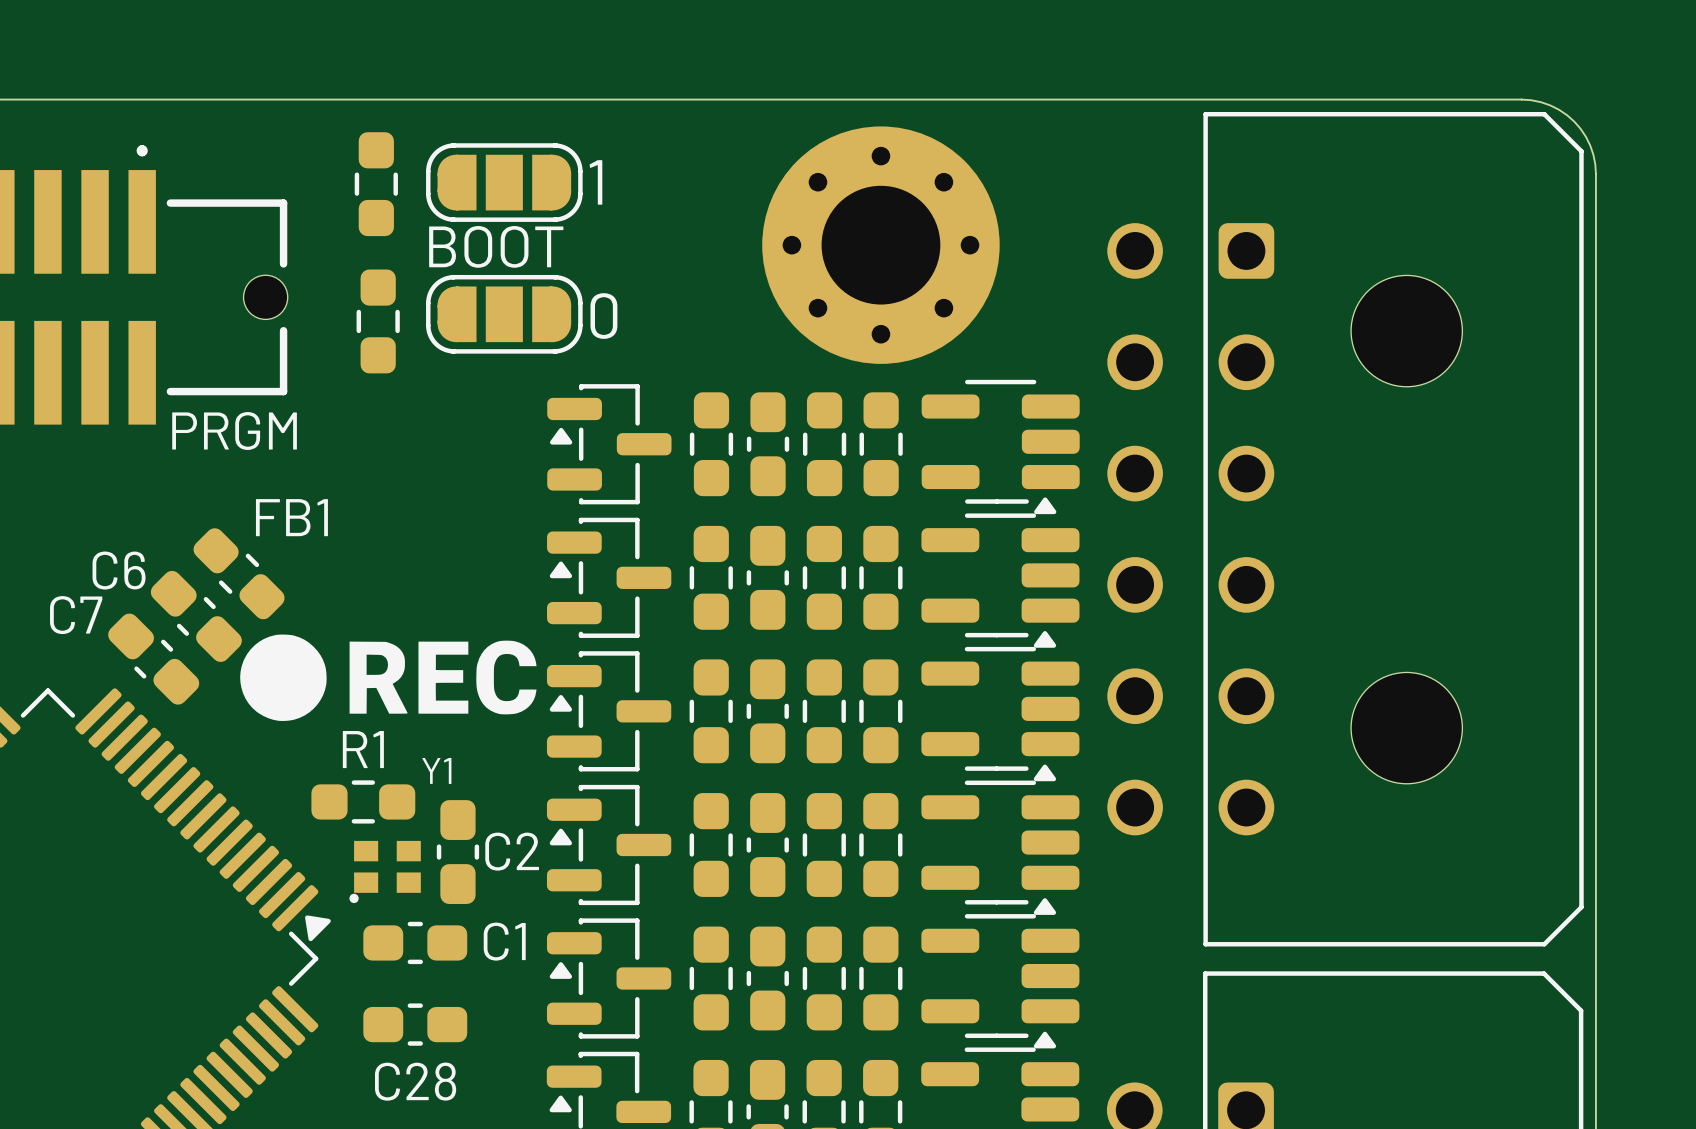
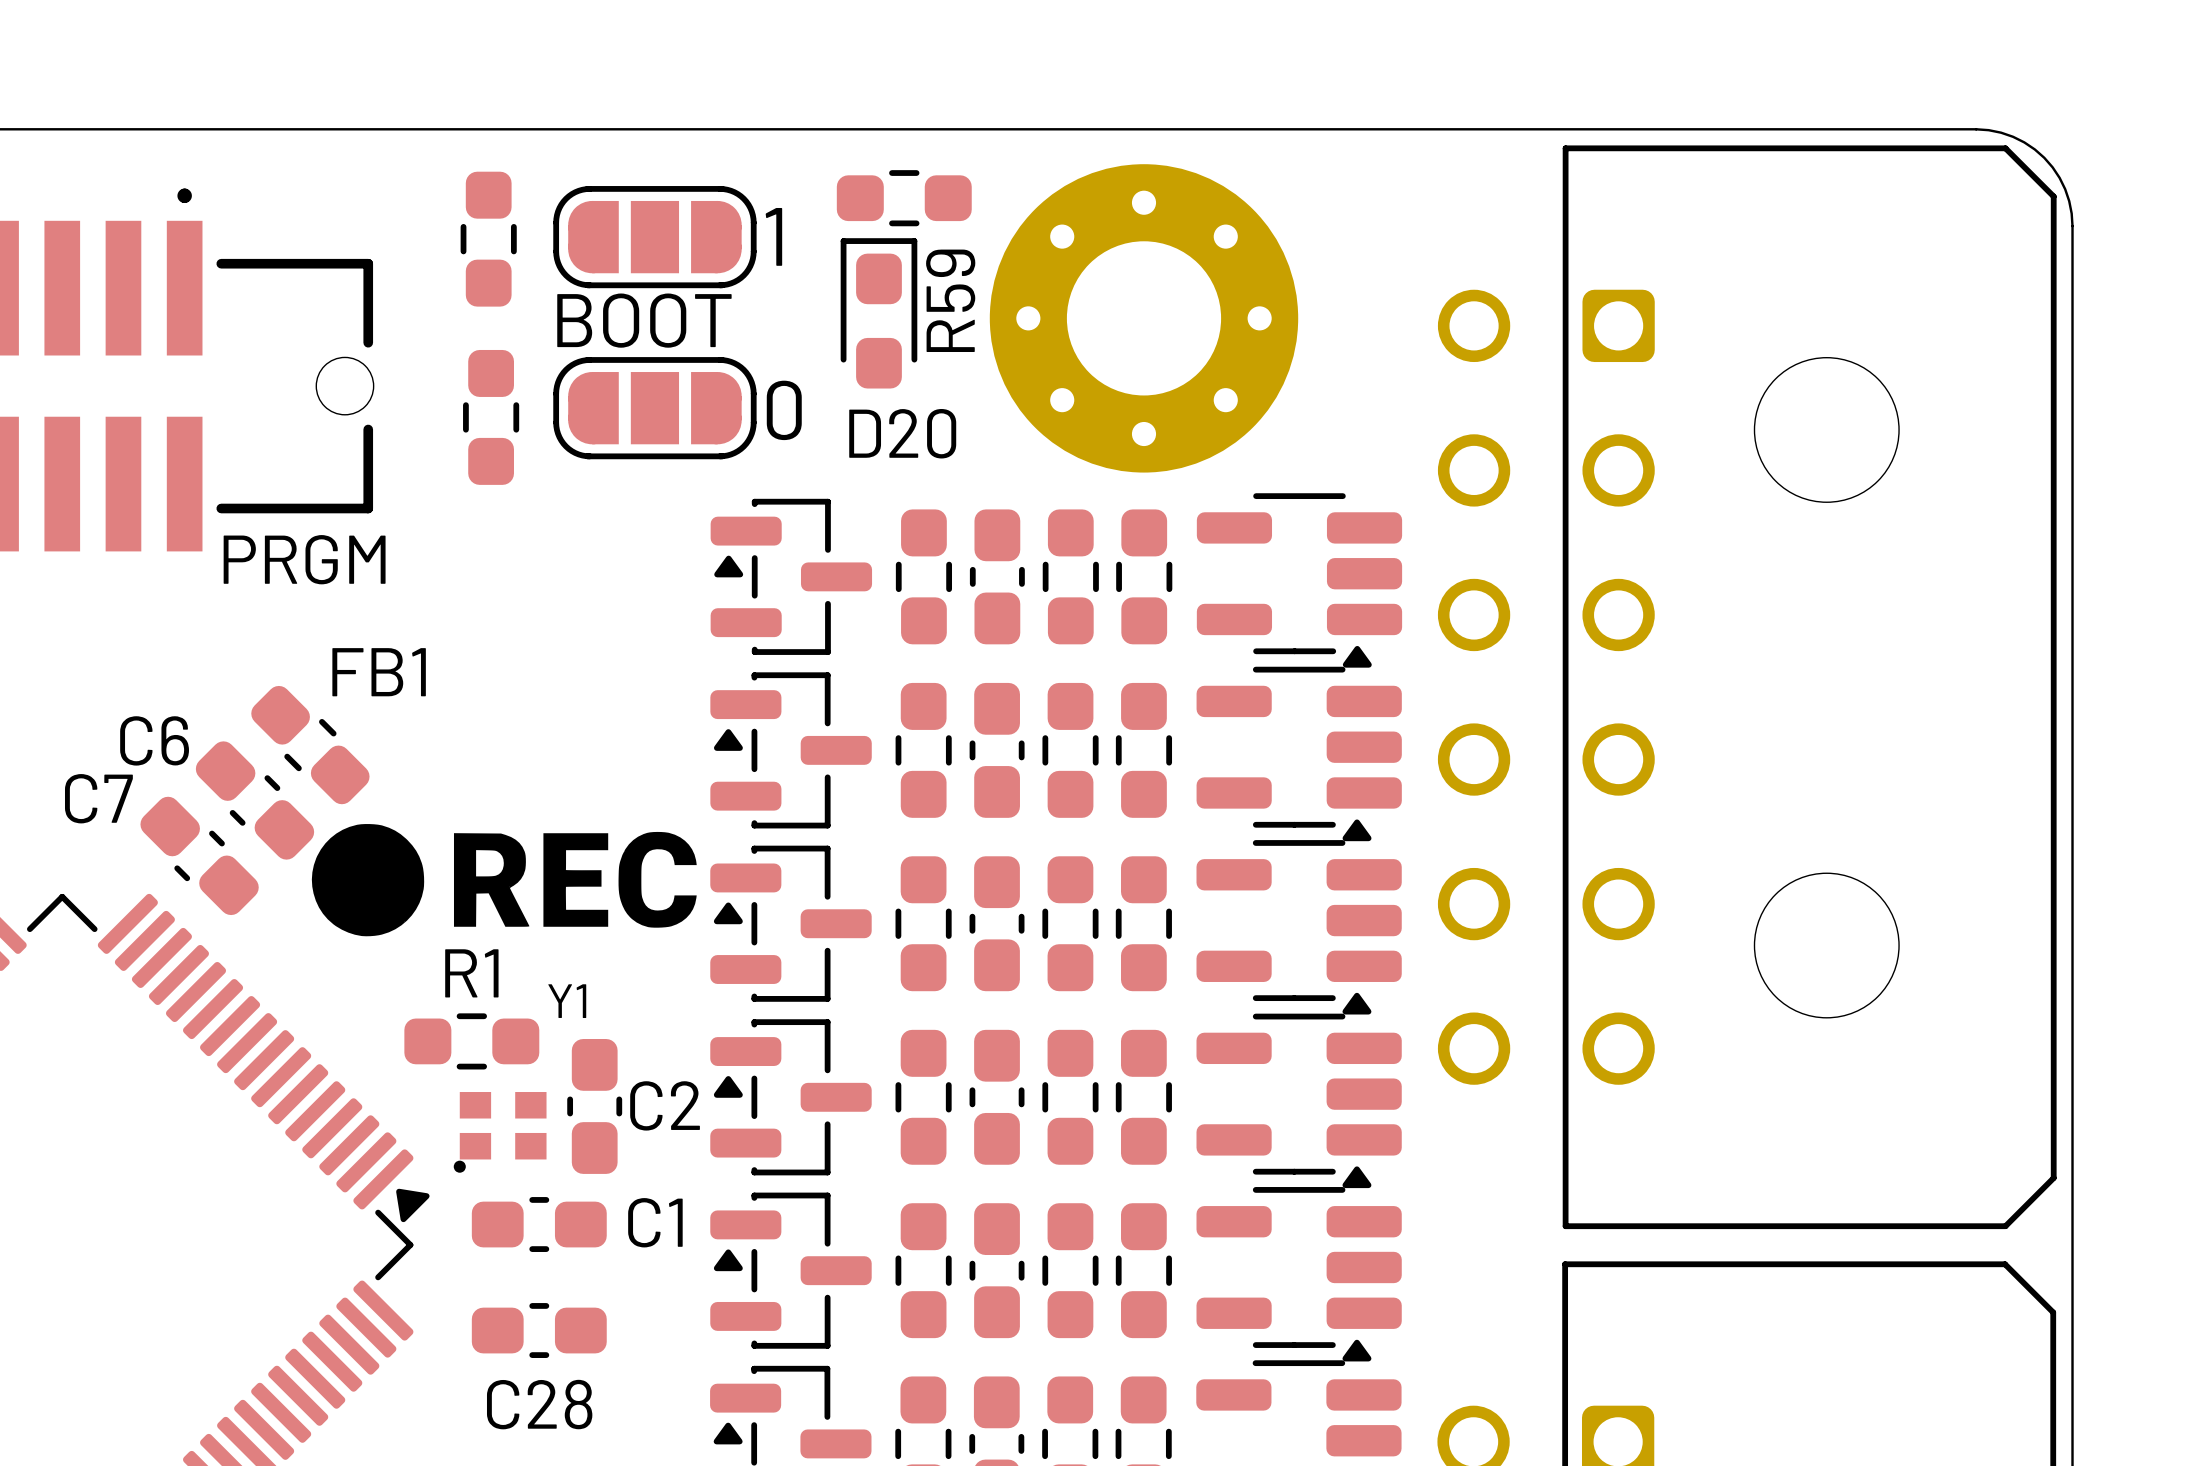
R59: none -> (904, 198)
D20: none -> (878, 313)

